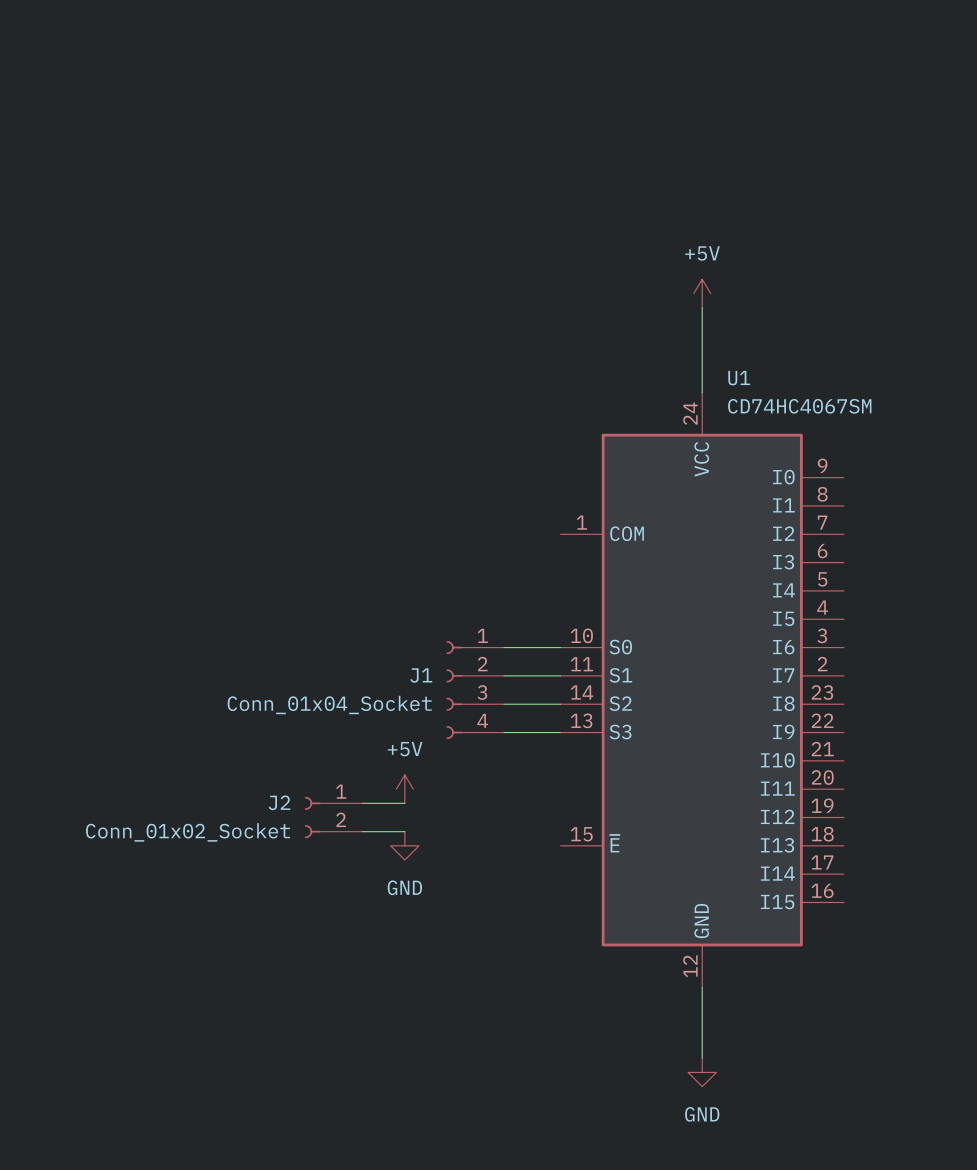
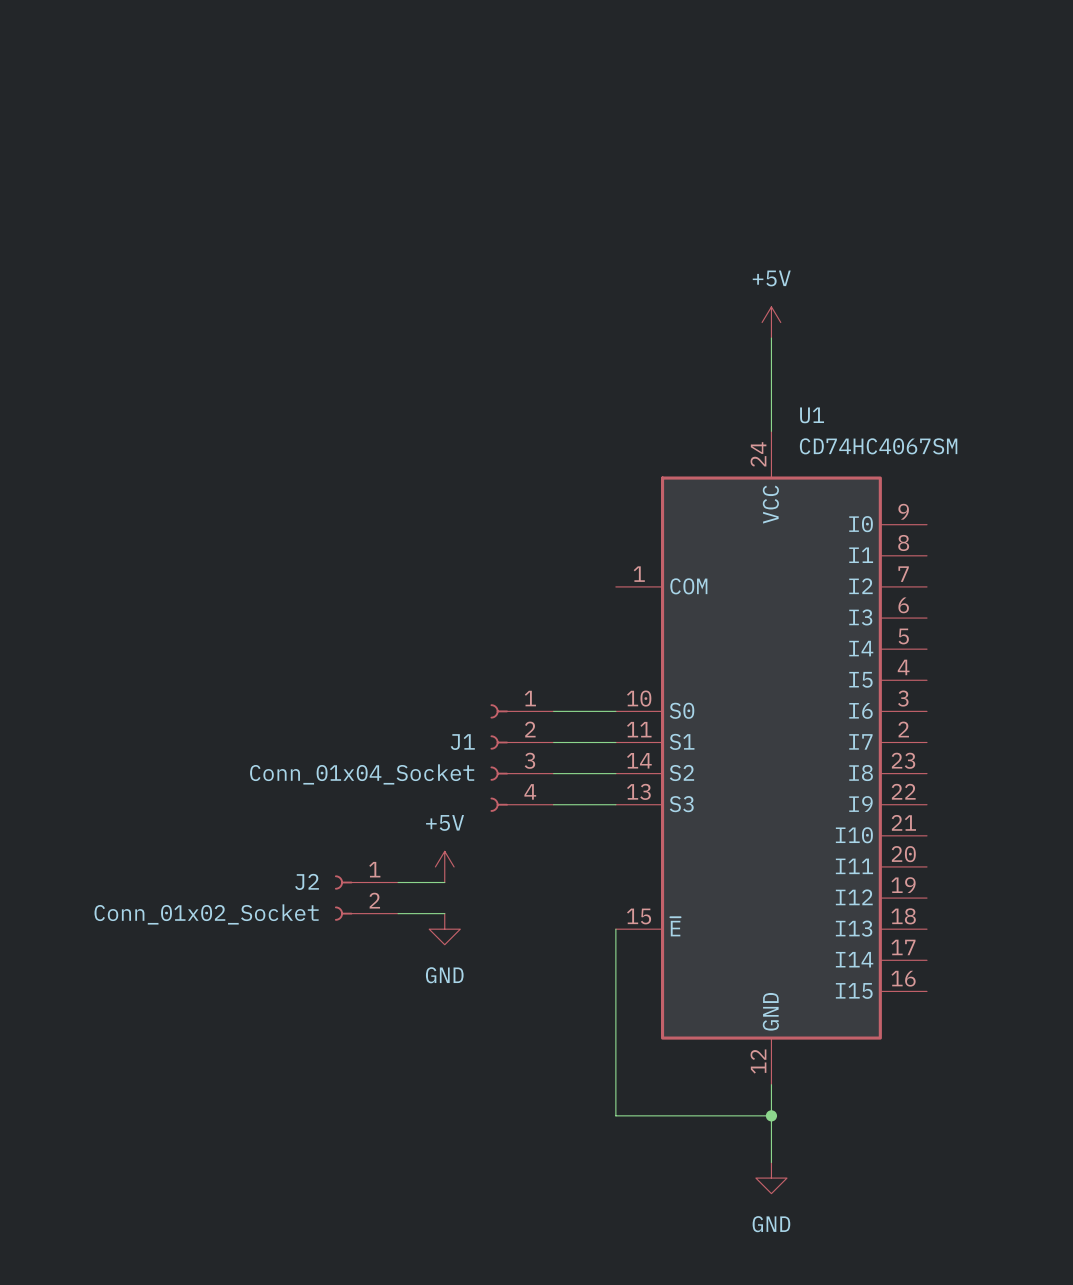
wire: none -> (615, 929) (615, 1115) (771, 1115)
junction: none -> (771, 1115)

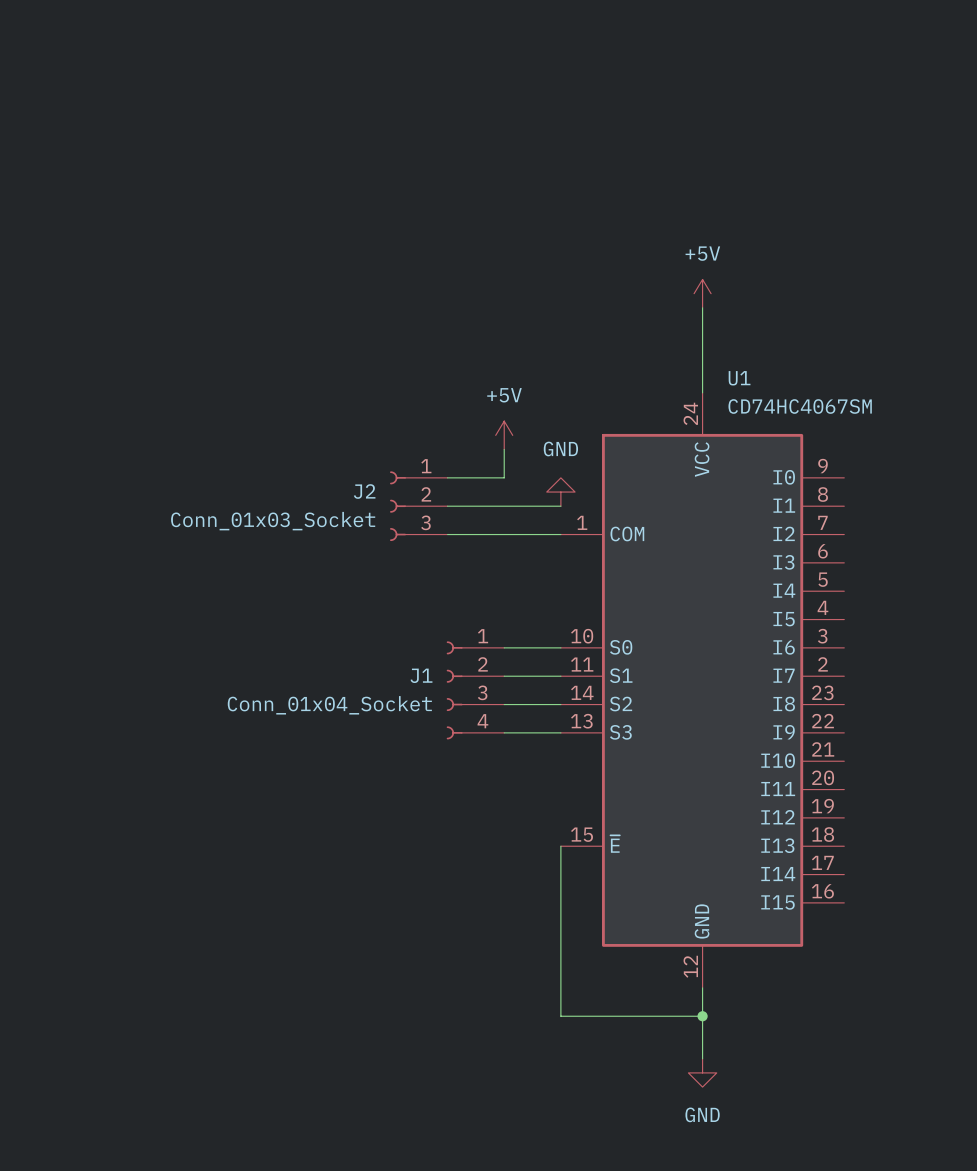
power symbol: none -> +5V (504, 435)
wire: none -> (504, 449) (504, 477) (447, 477)
power symbol: none -> GND (560, 492)
wire: none -> (447, 506) (560, 506)
wire: none -> (447, 534) (560, 534)
power symbol: +5V (444, 866) -> none
J2 symbol: [334, 875, 399, 921] -> [390, 471, 448, 542]
wire: (398, 882) (444, 882) -> none
wire: (398, 913) (444, 913) -> none
J2 value: Conn_01x02_Socket (206, 914) -> Conn_01x03_Socket (273, 521)
power symbol: GND (444, 929) -> none

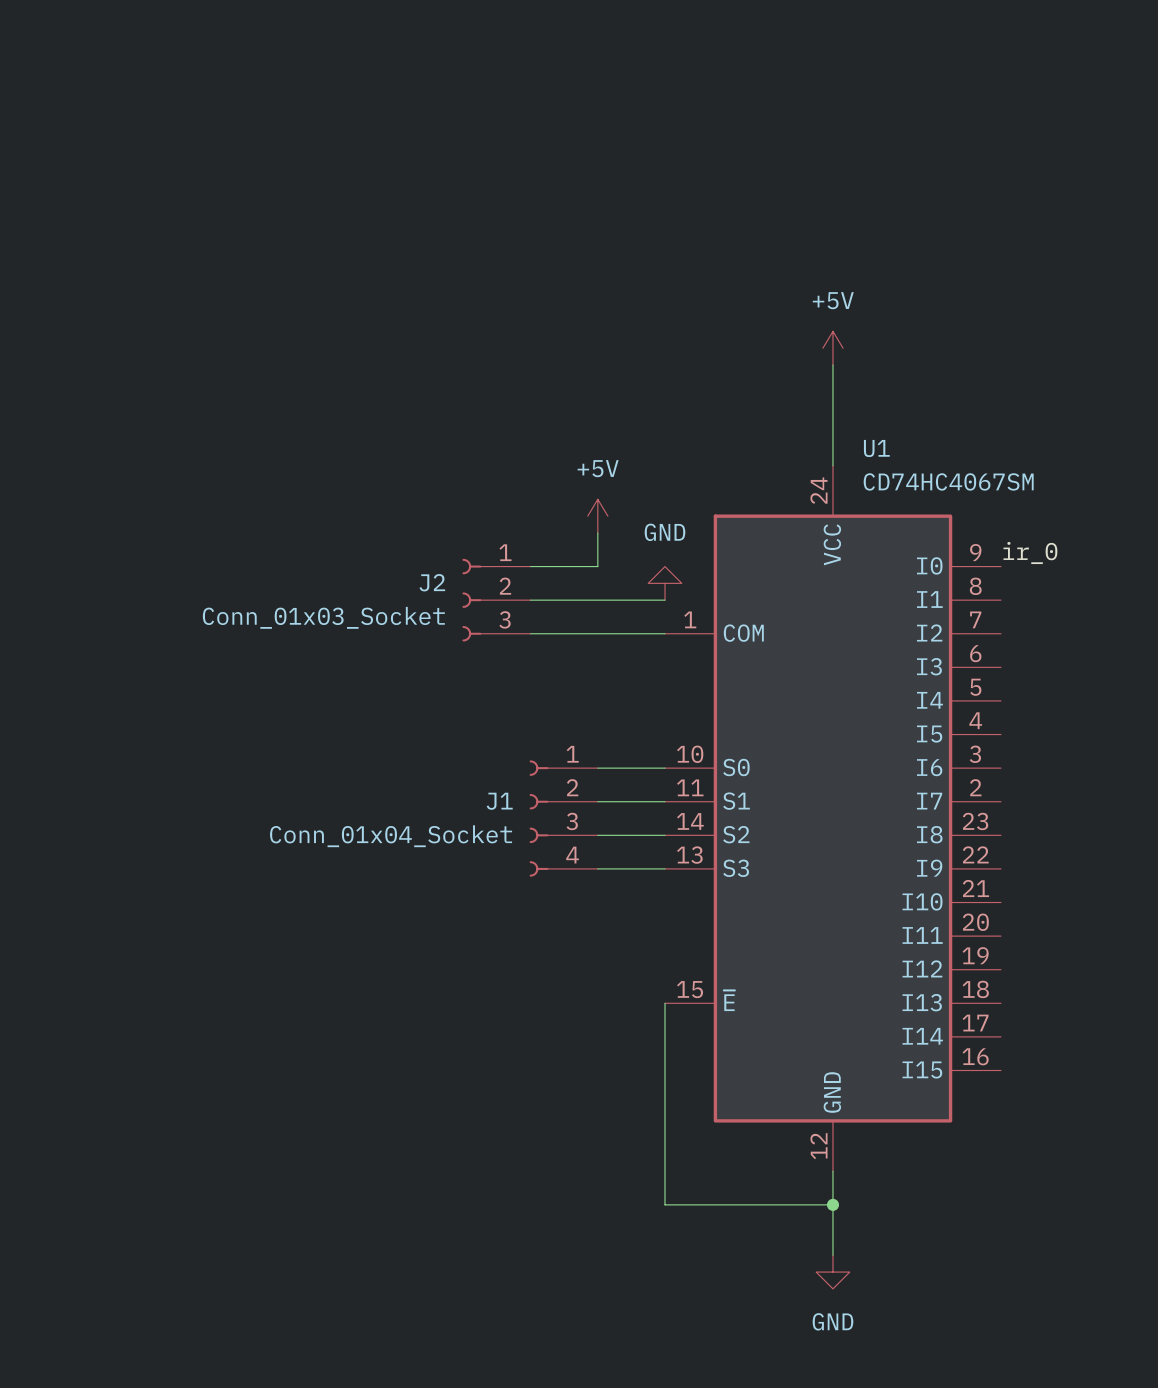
label: none -> ir_0 (1030, 553)

